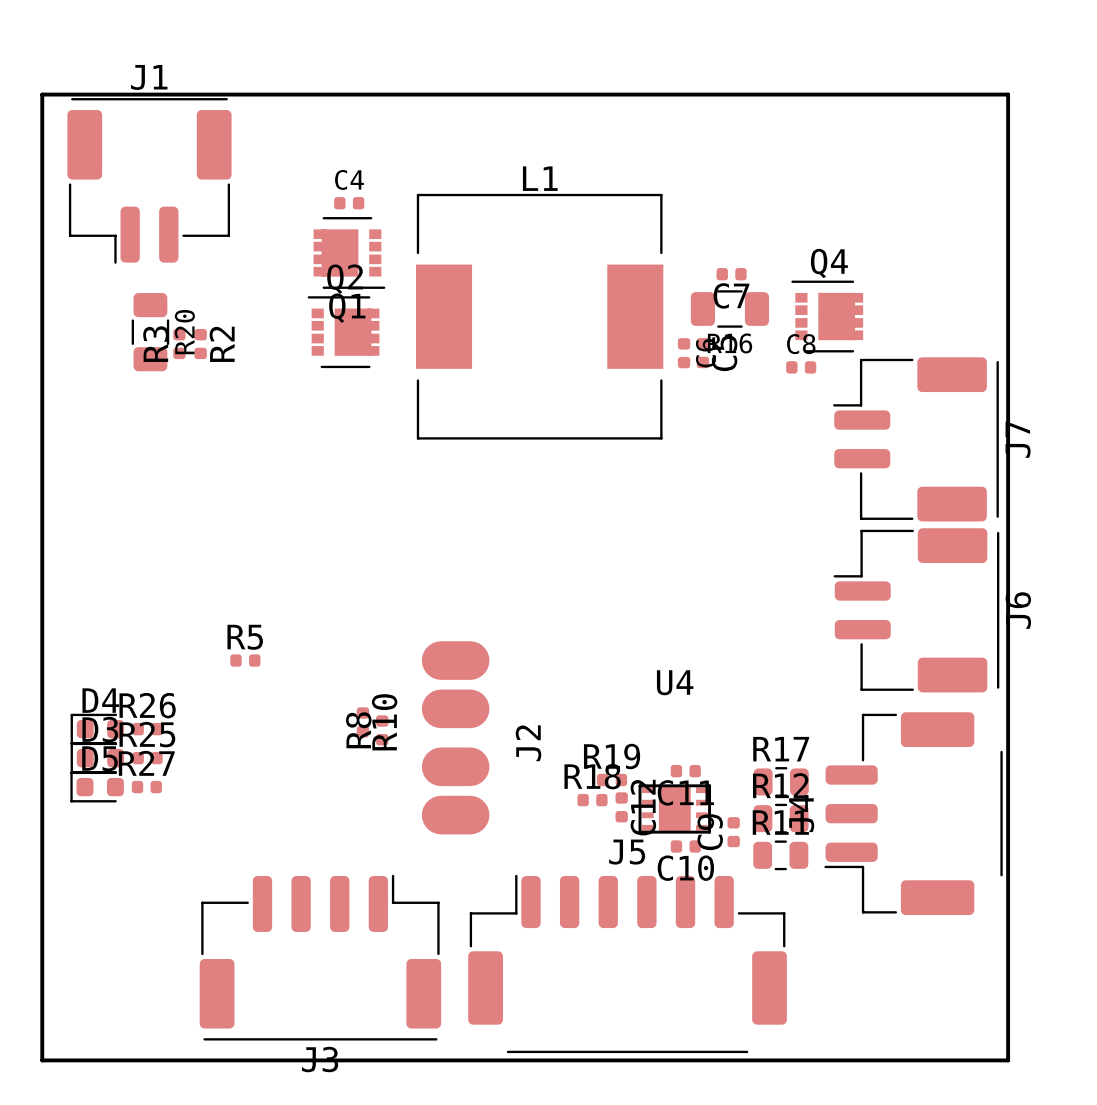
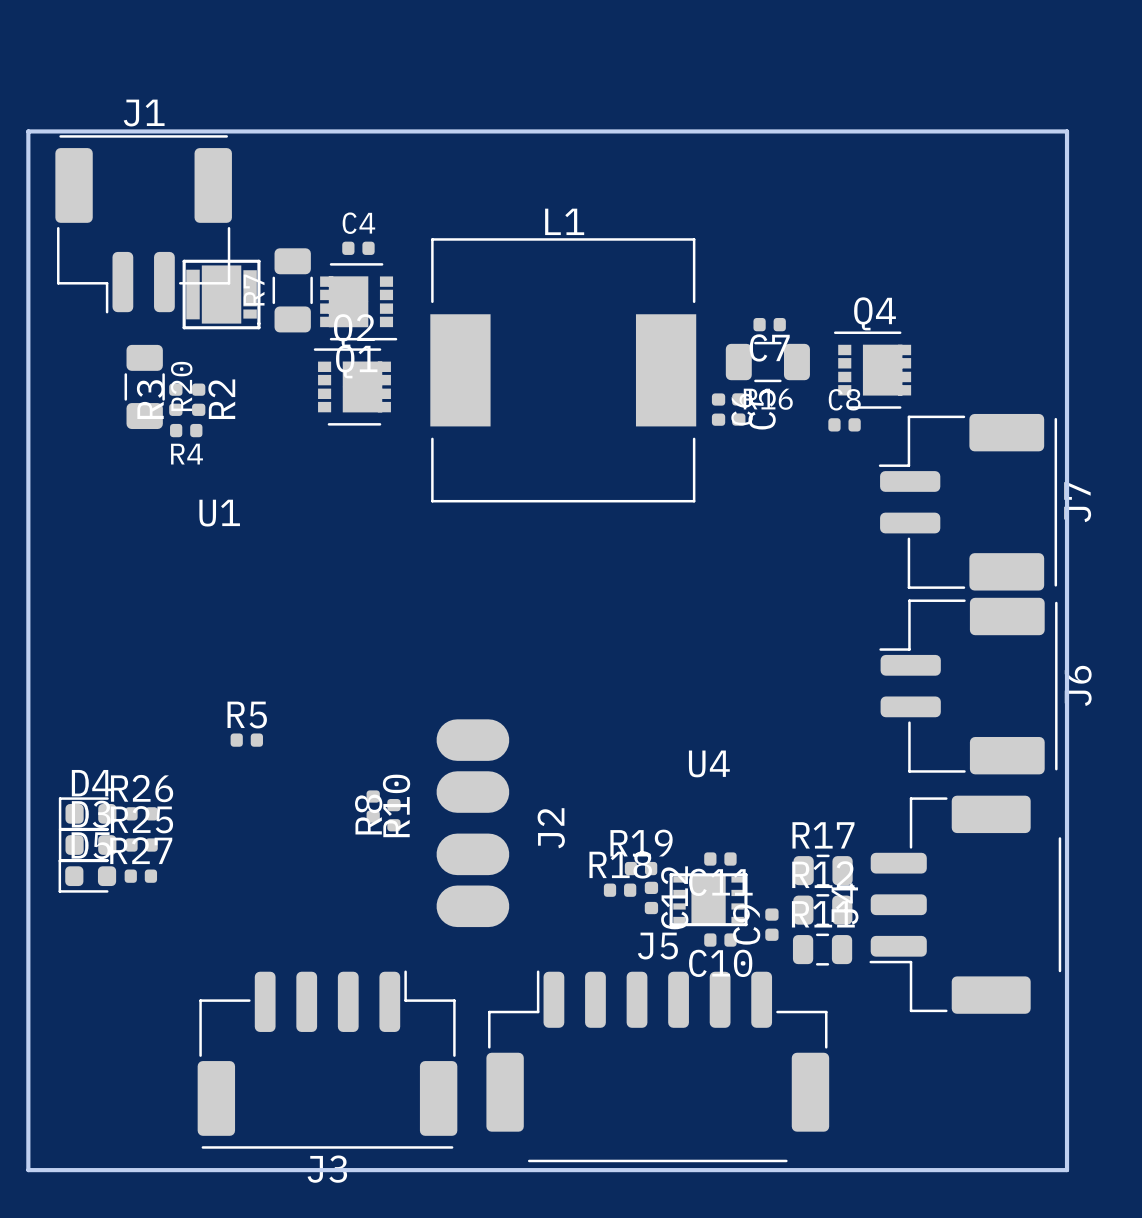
part: none -> (292, 290)
U1: none -> (221, 294)
R4: none -> (186, 430)

